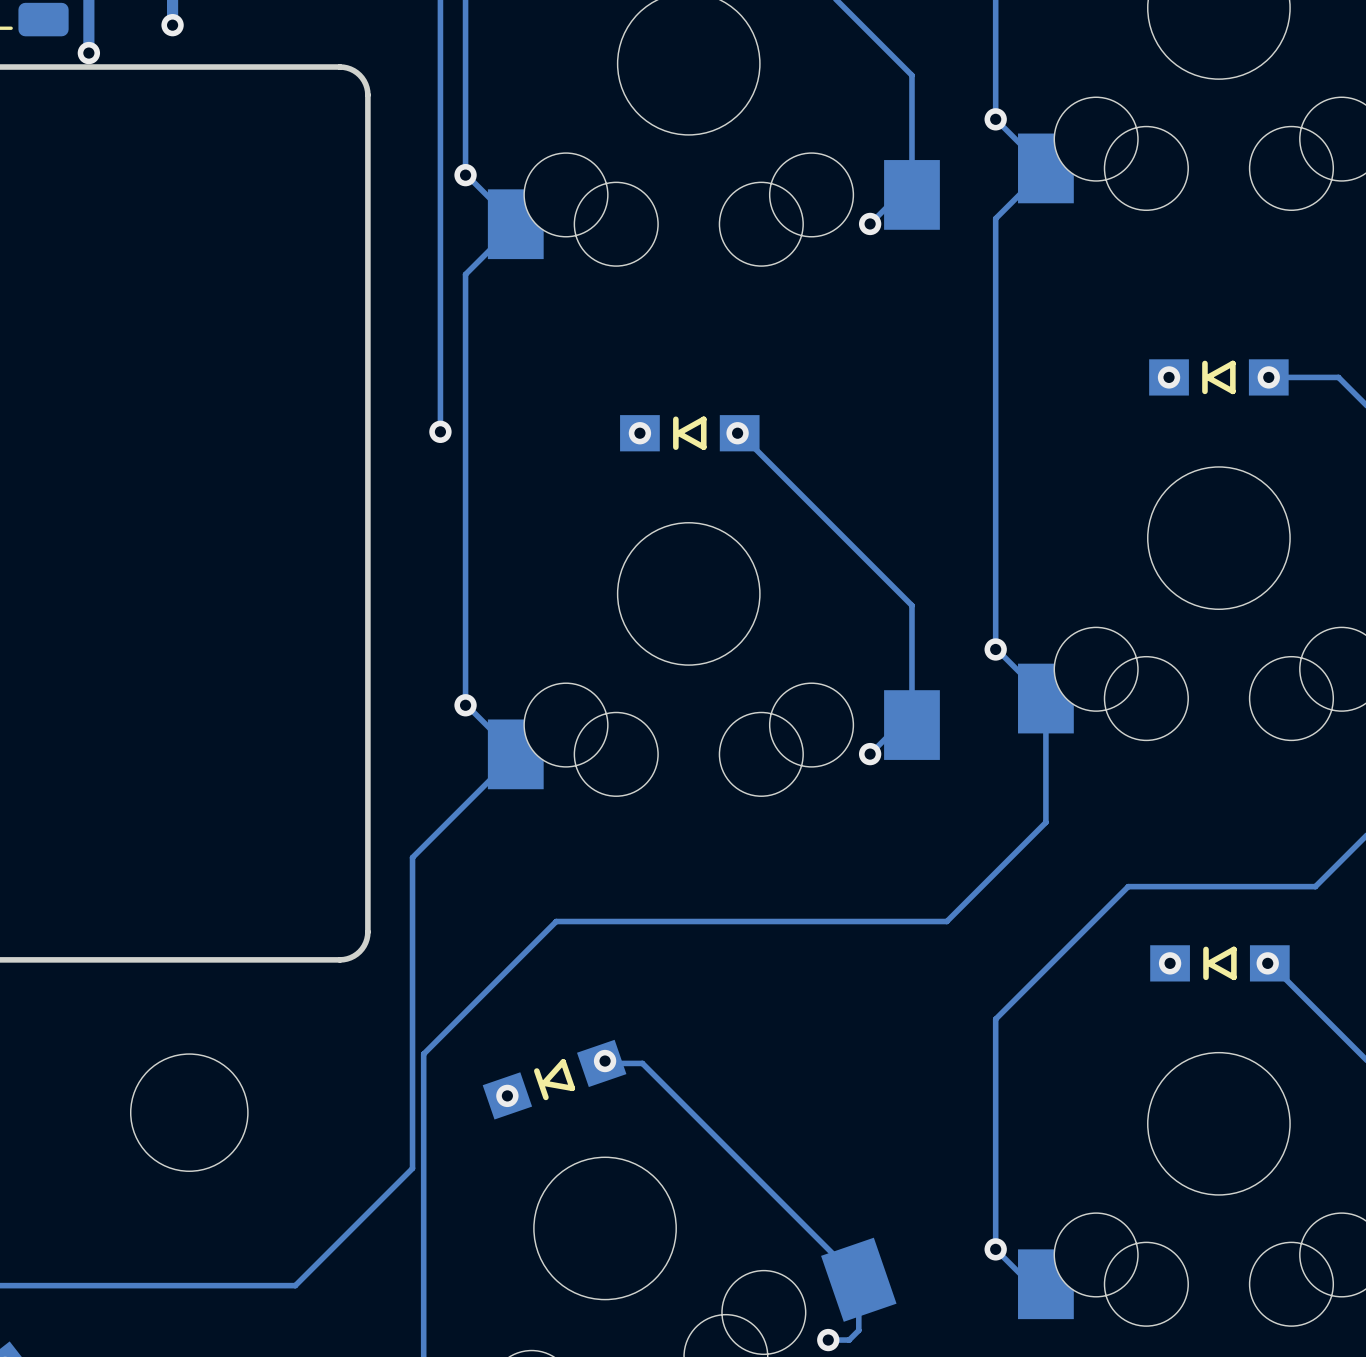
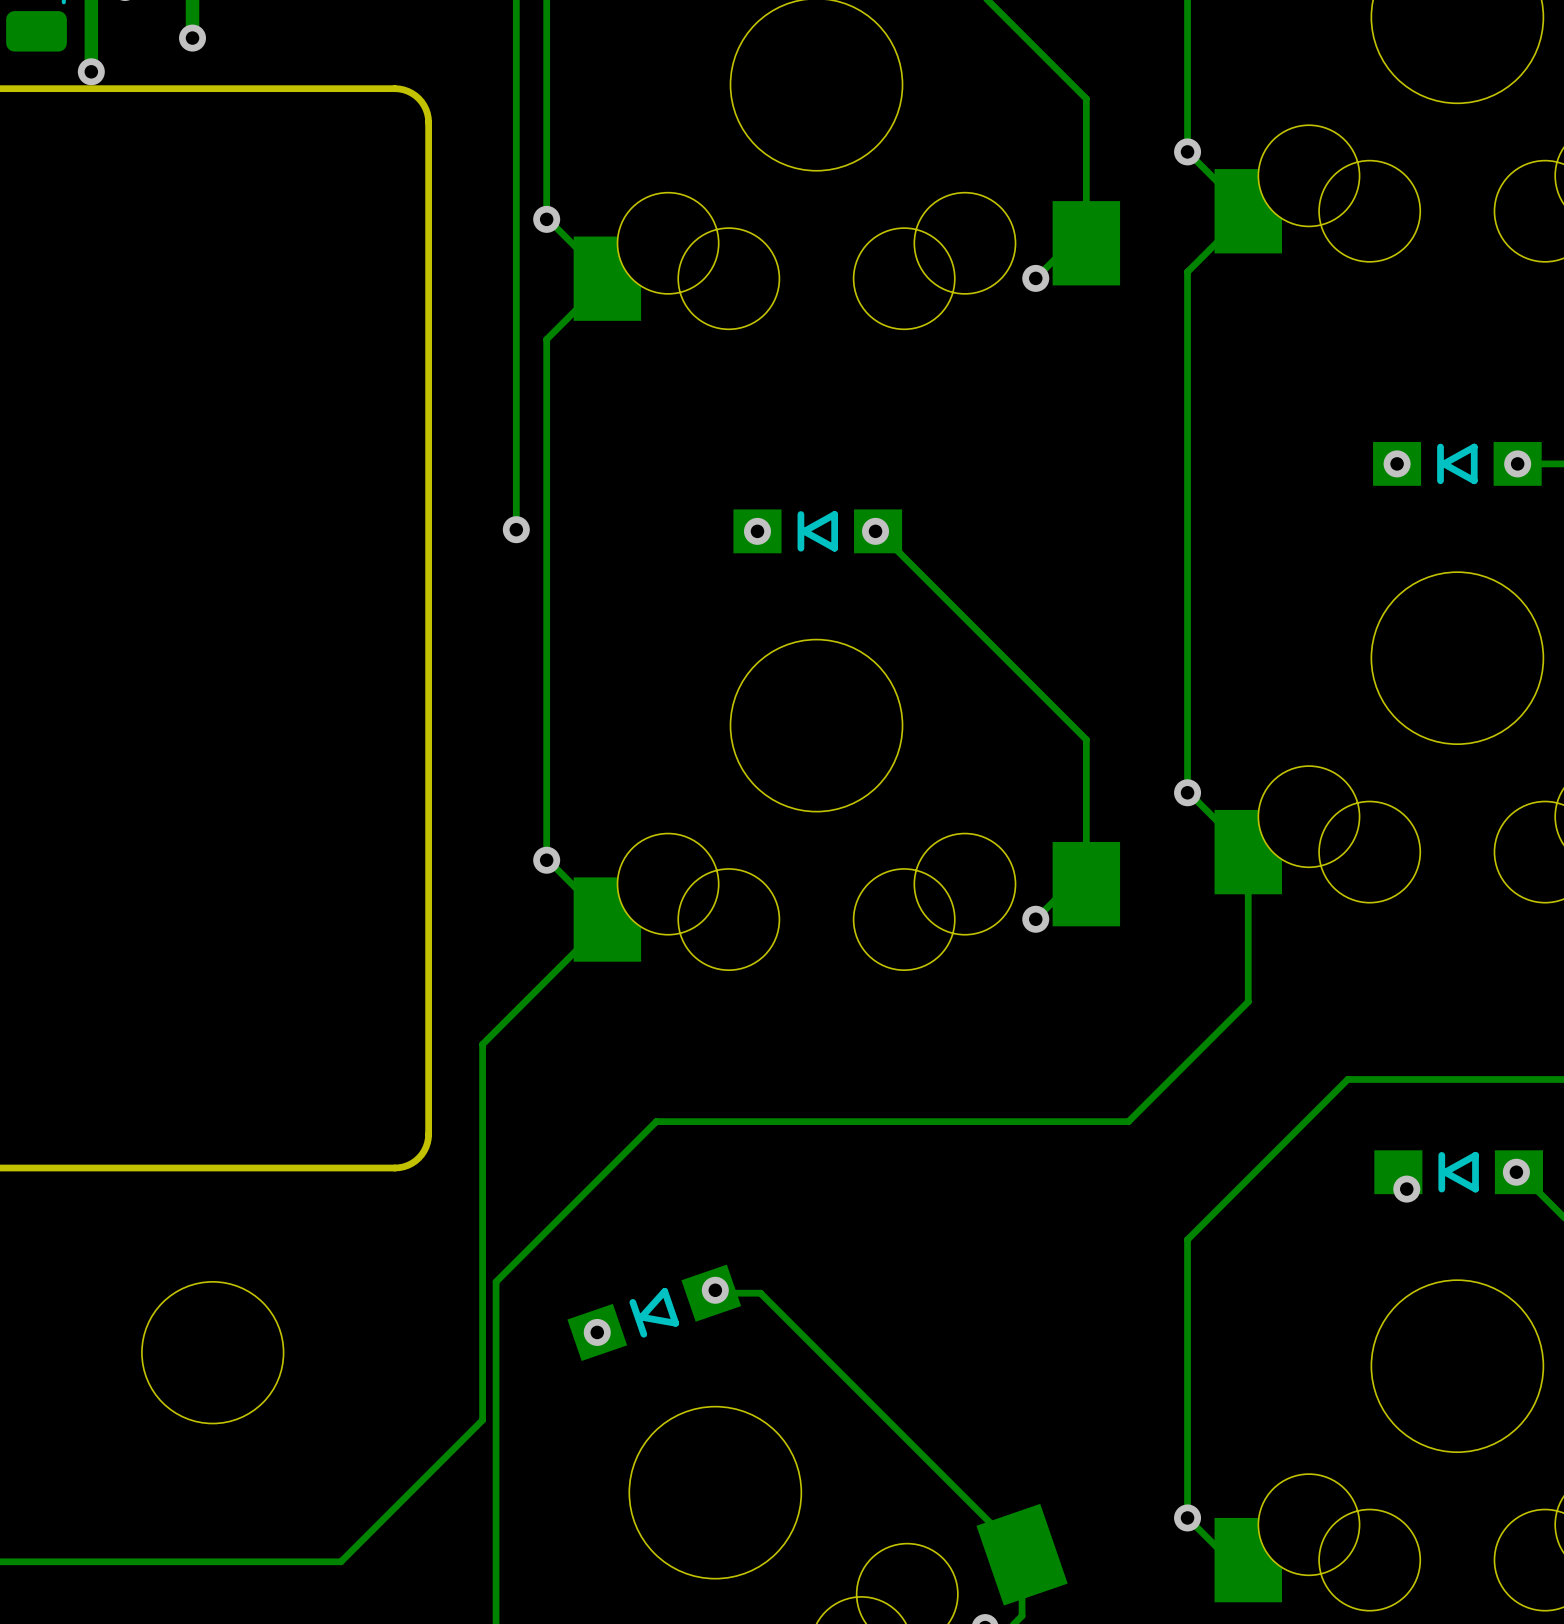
via position: (1170, 963) -> (1406, 1189)

